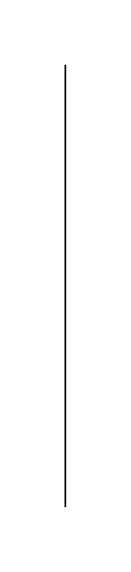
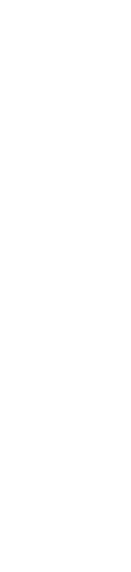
wire: (65, 65) (65, 506) -> none

